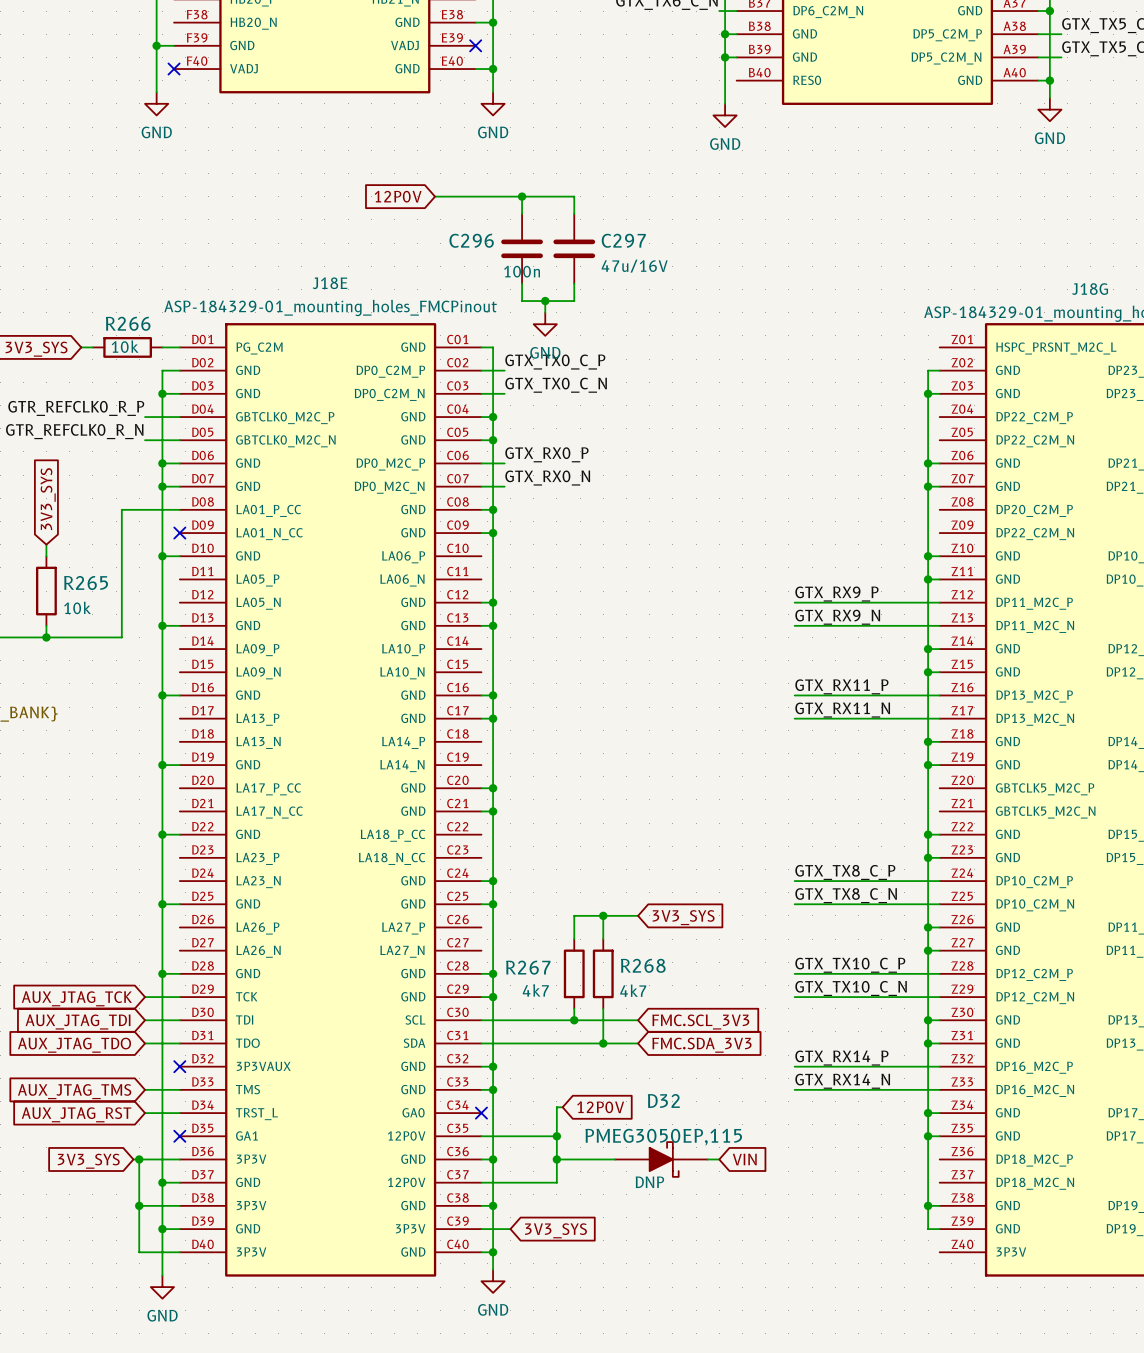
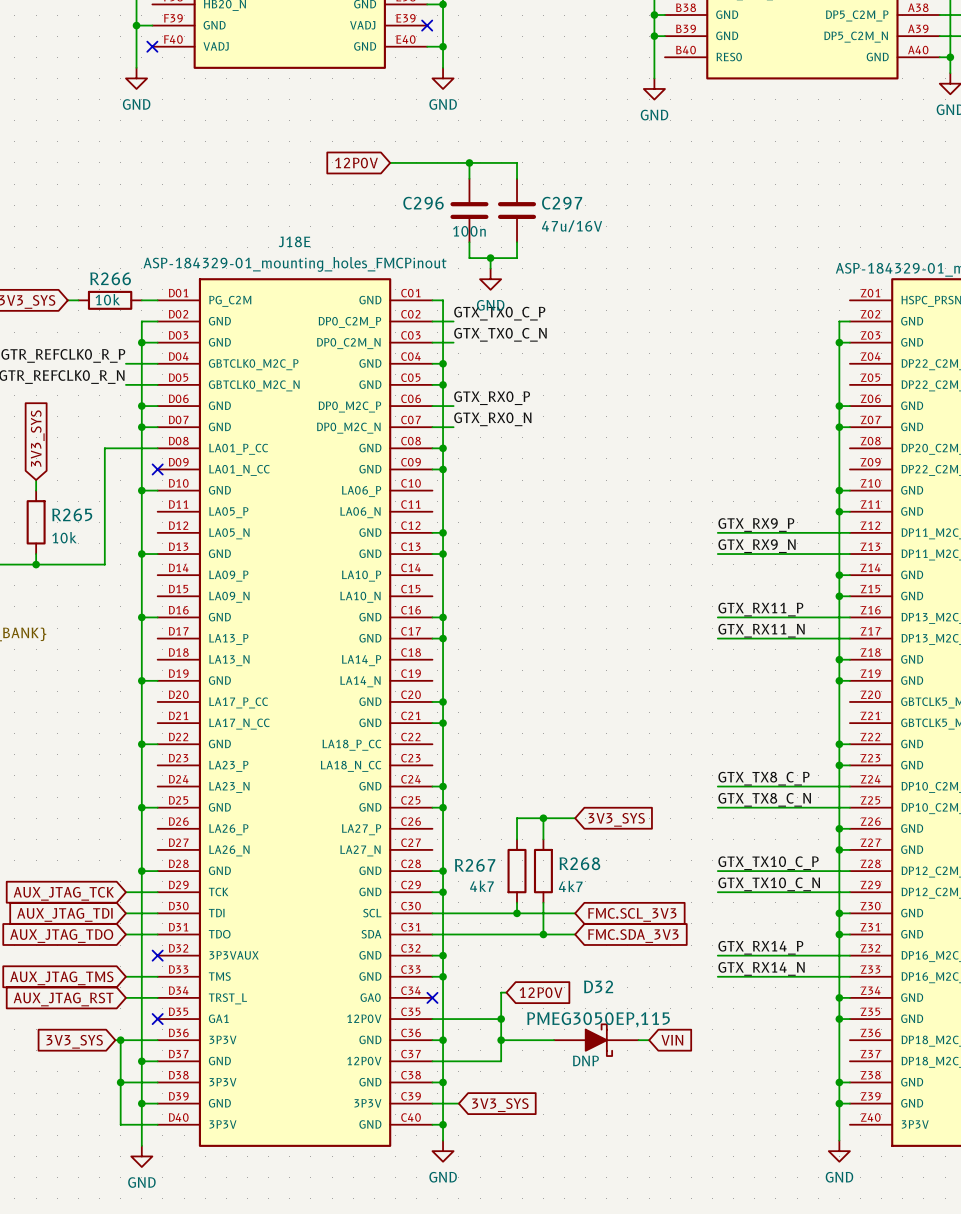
wire: none -> (839, 1103) (839, 1140)
junction: none -> (839, 1103)
power symbol: none -> GND (839, 1151)

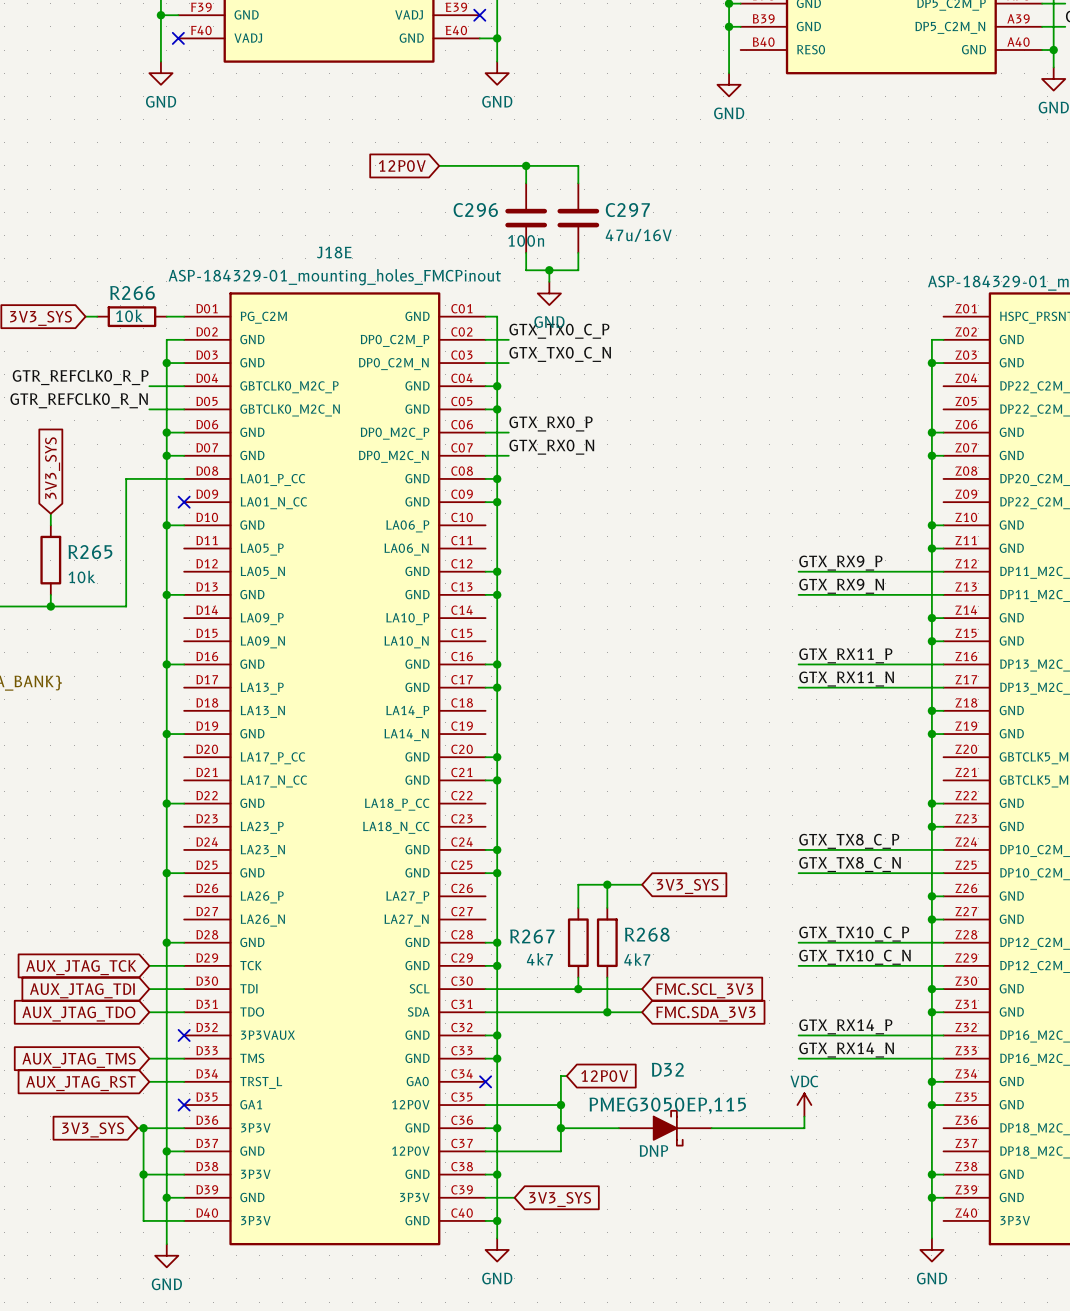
power symbol: none -> VDC (804, 1105)
wire: none -> (804, 1116) (804, 1128) (723, 1128)
global label: VIN (672, 1040) -> none

